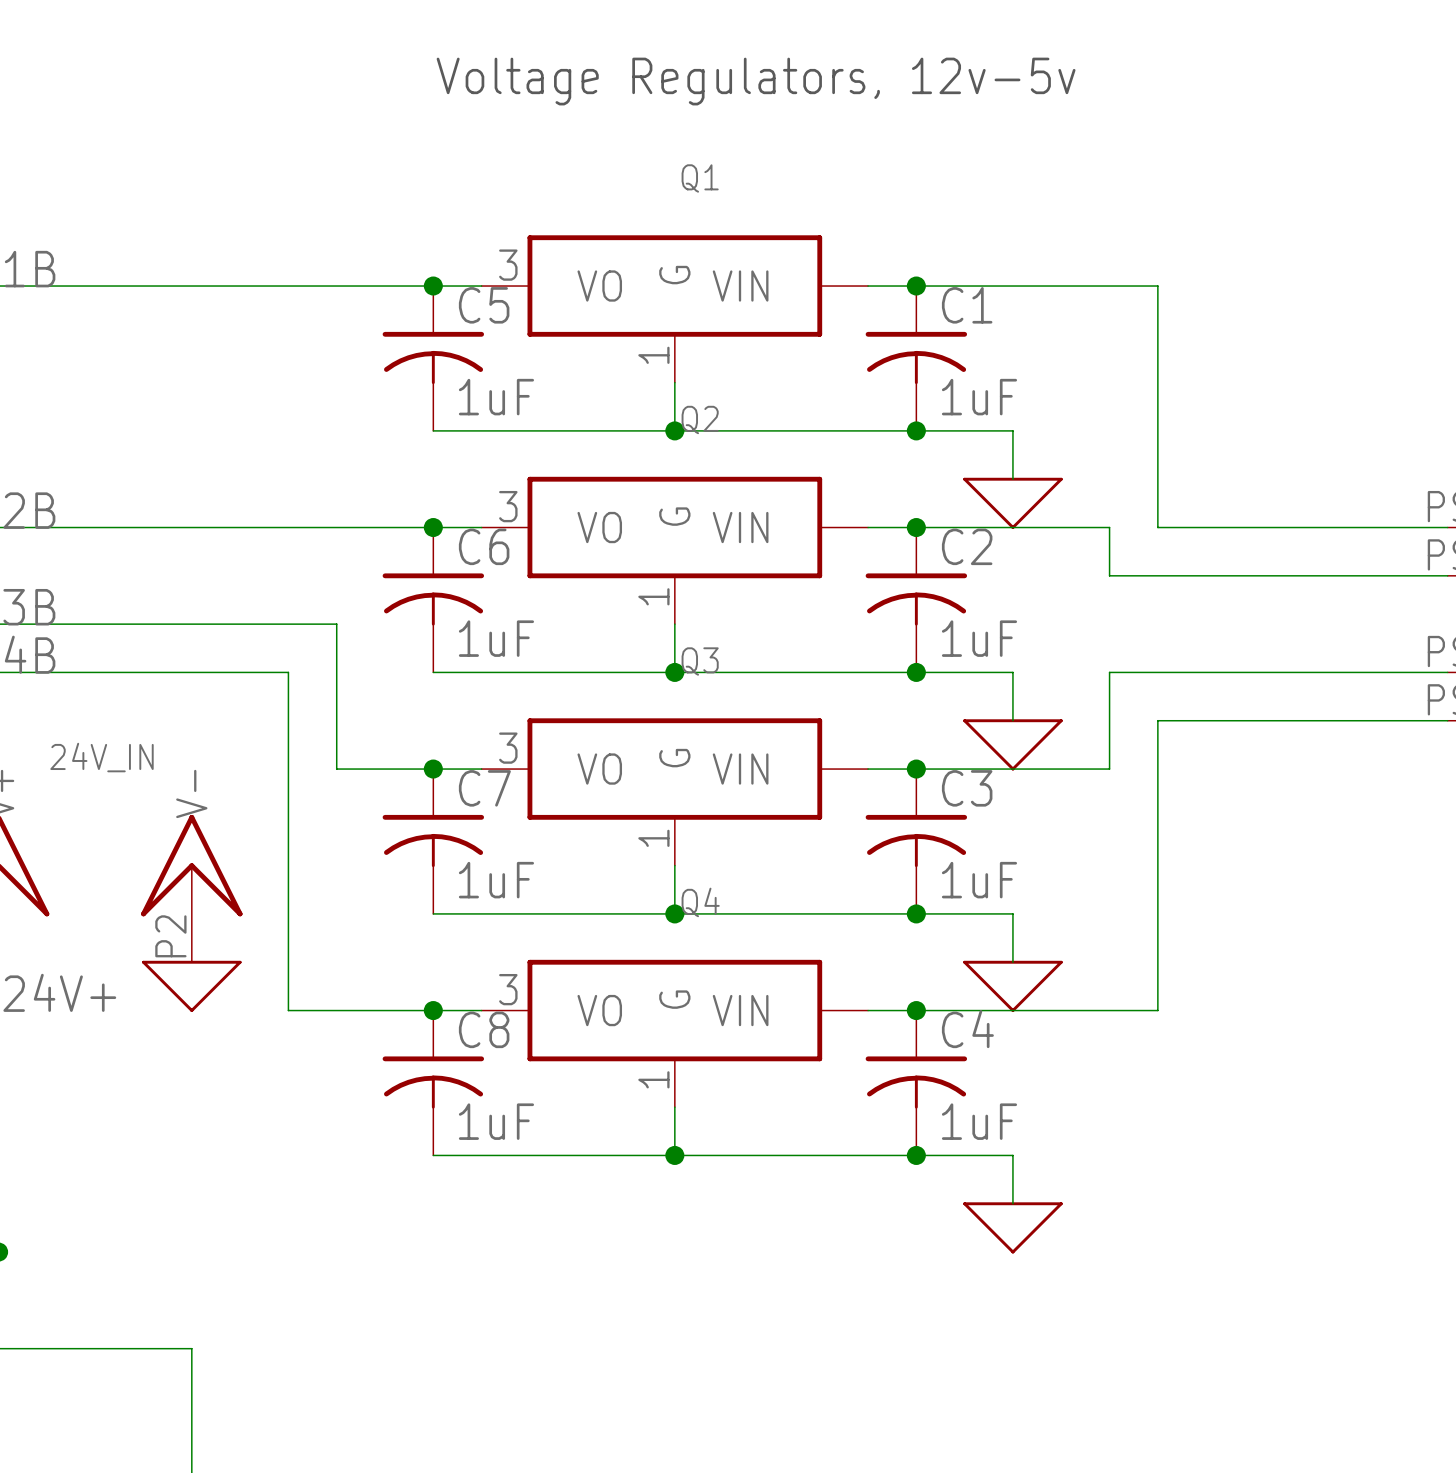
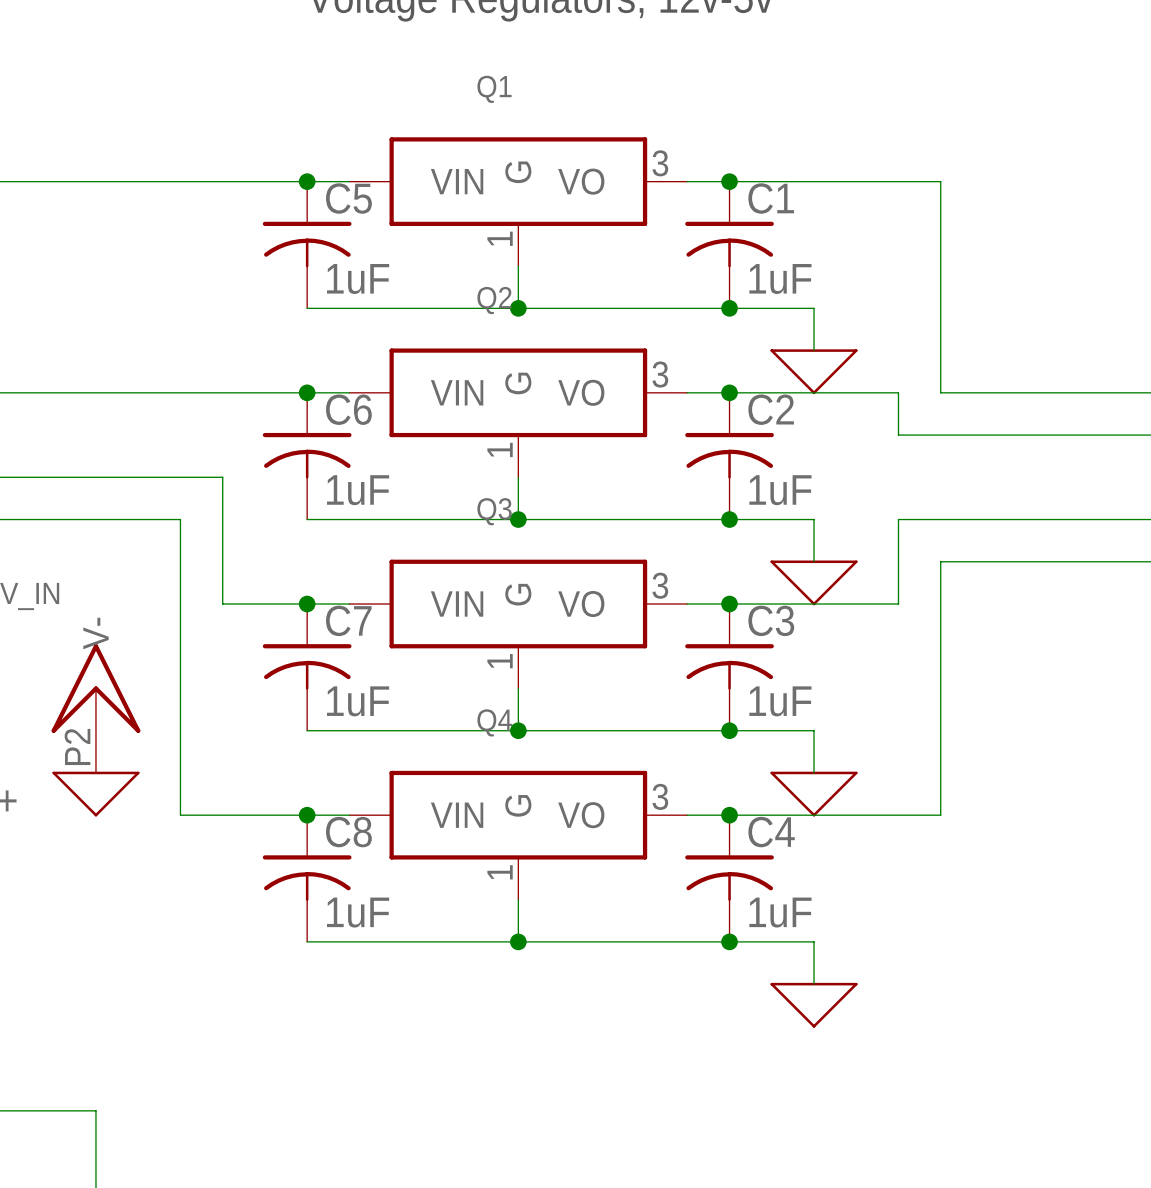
Q1 flip: as is (674, 286) -> left-right (518, 181)
Q2 flip: as is (674, 527) -> left-right (518, 392)
Q3 flip: as is (674, 769) -> left-right (518, 604)
Q4 flip: as is (674, 1010) -> left-right (518, 815)

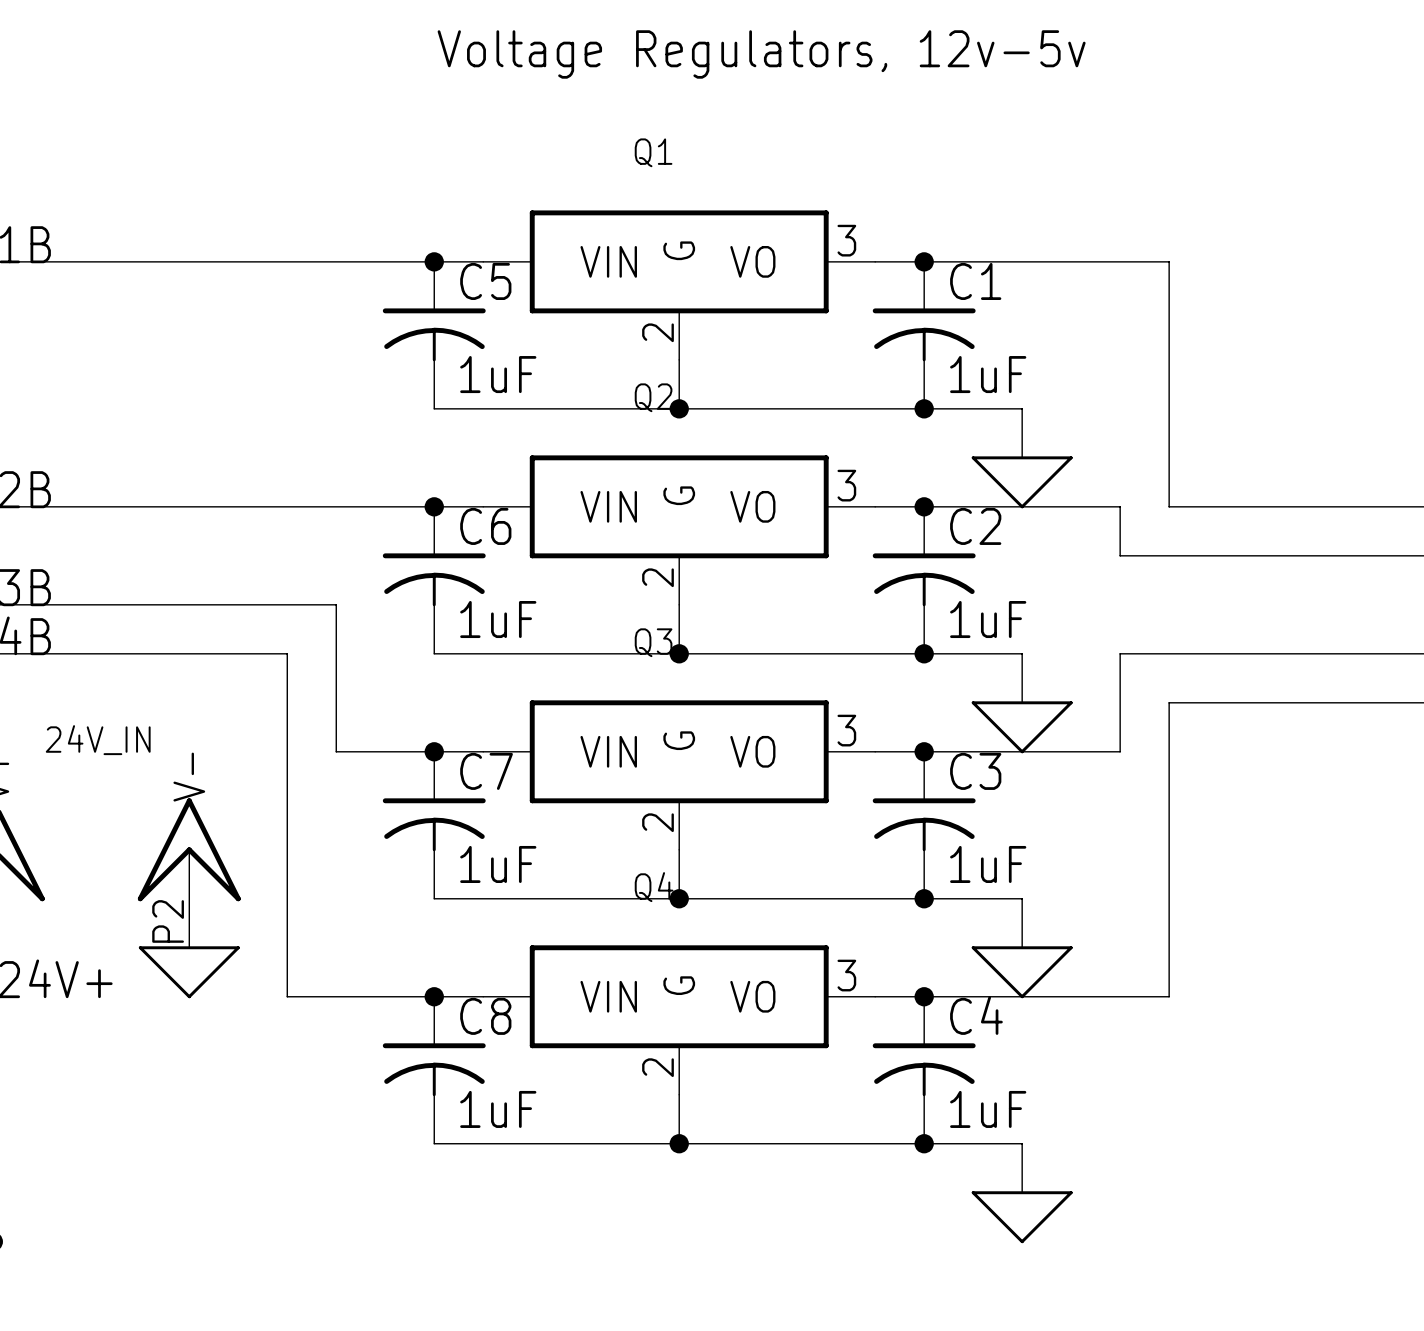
Q1 pin number: 1 (500, 238) -> 2 (658, 332)
Q2 pin number: 1 (500, 449) -> 2 (658, 577)
Q3 pin number: 1 (500, 661) -> 2 (658, 822)
Q4 pin number: 1 (500, 872) -> 2 (658, 1067)

